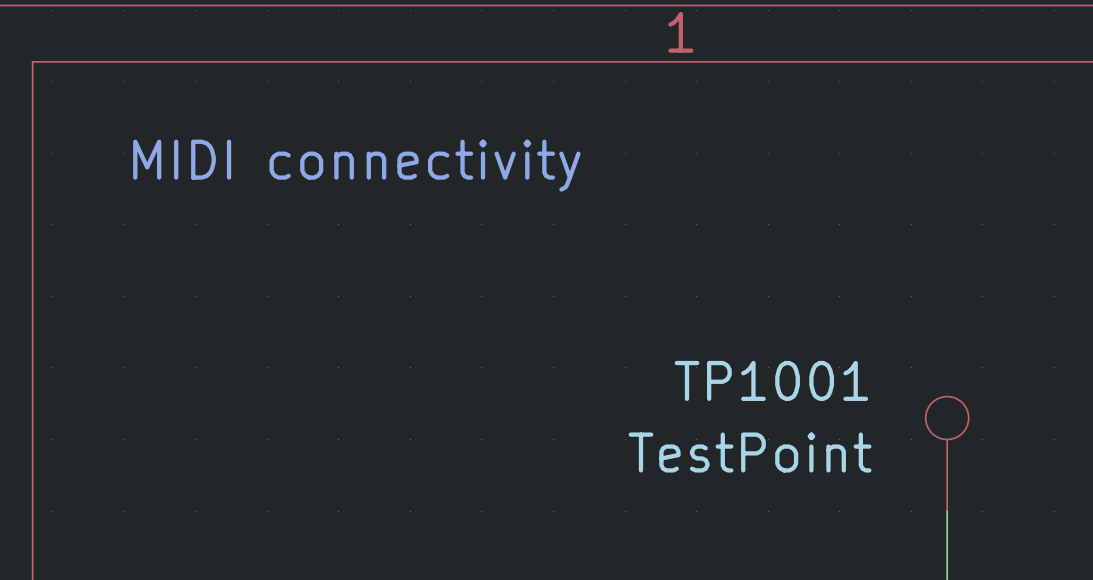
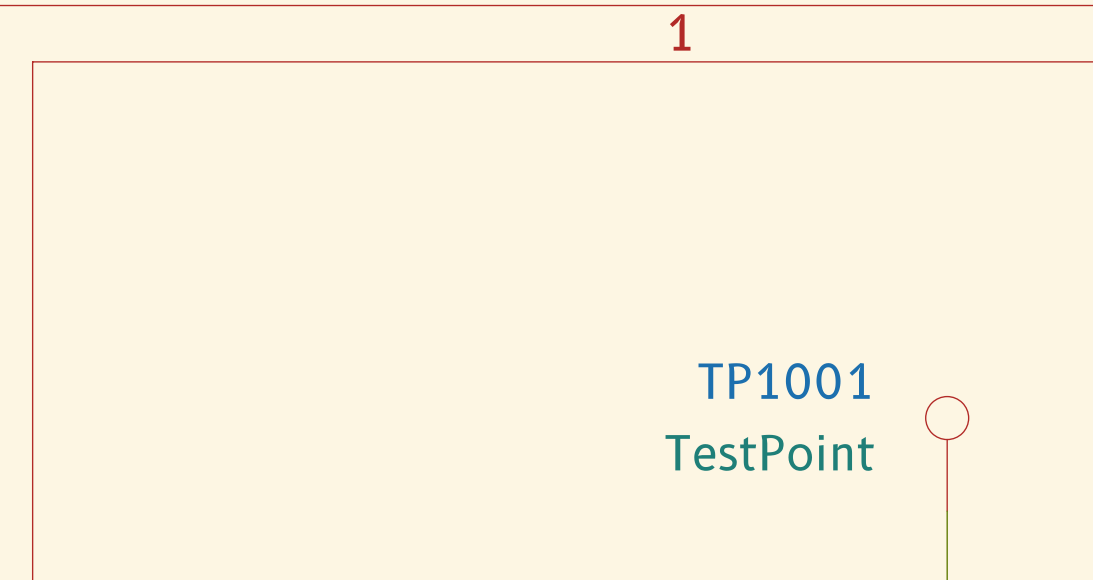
text: MIDI connectivity (356, 165) -> none

